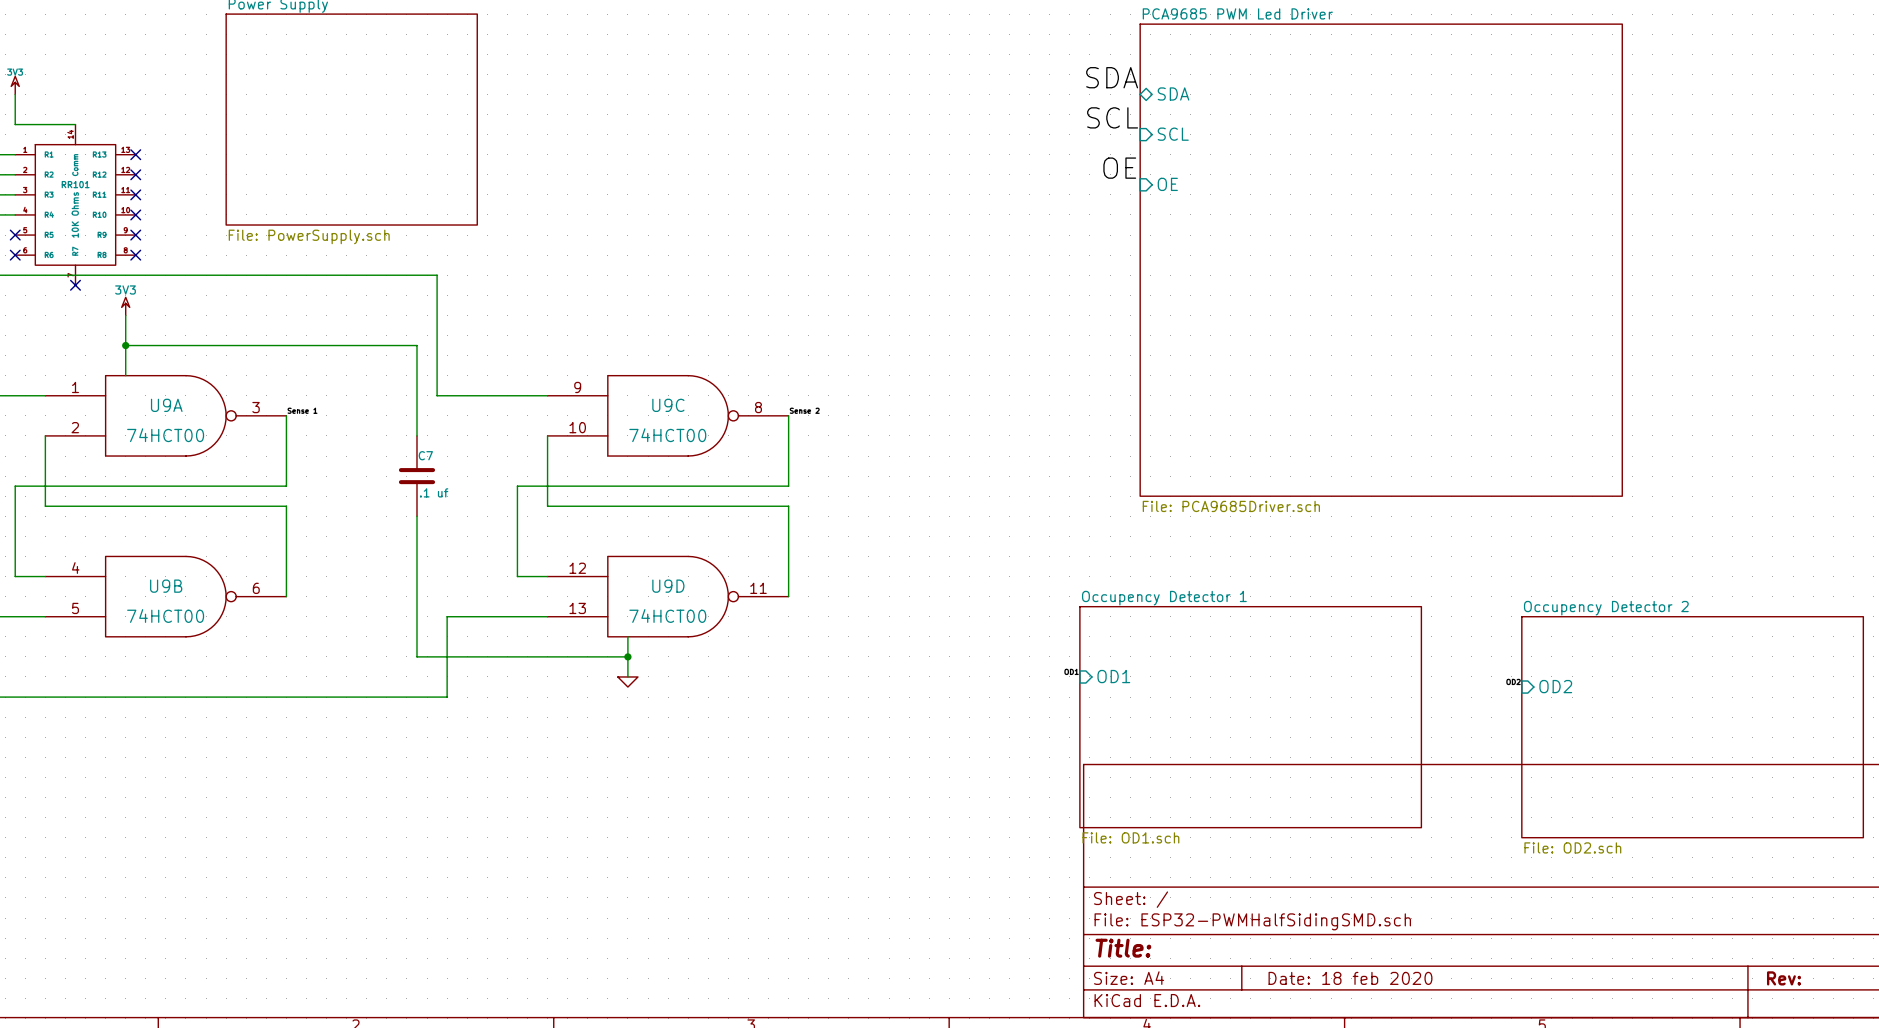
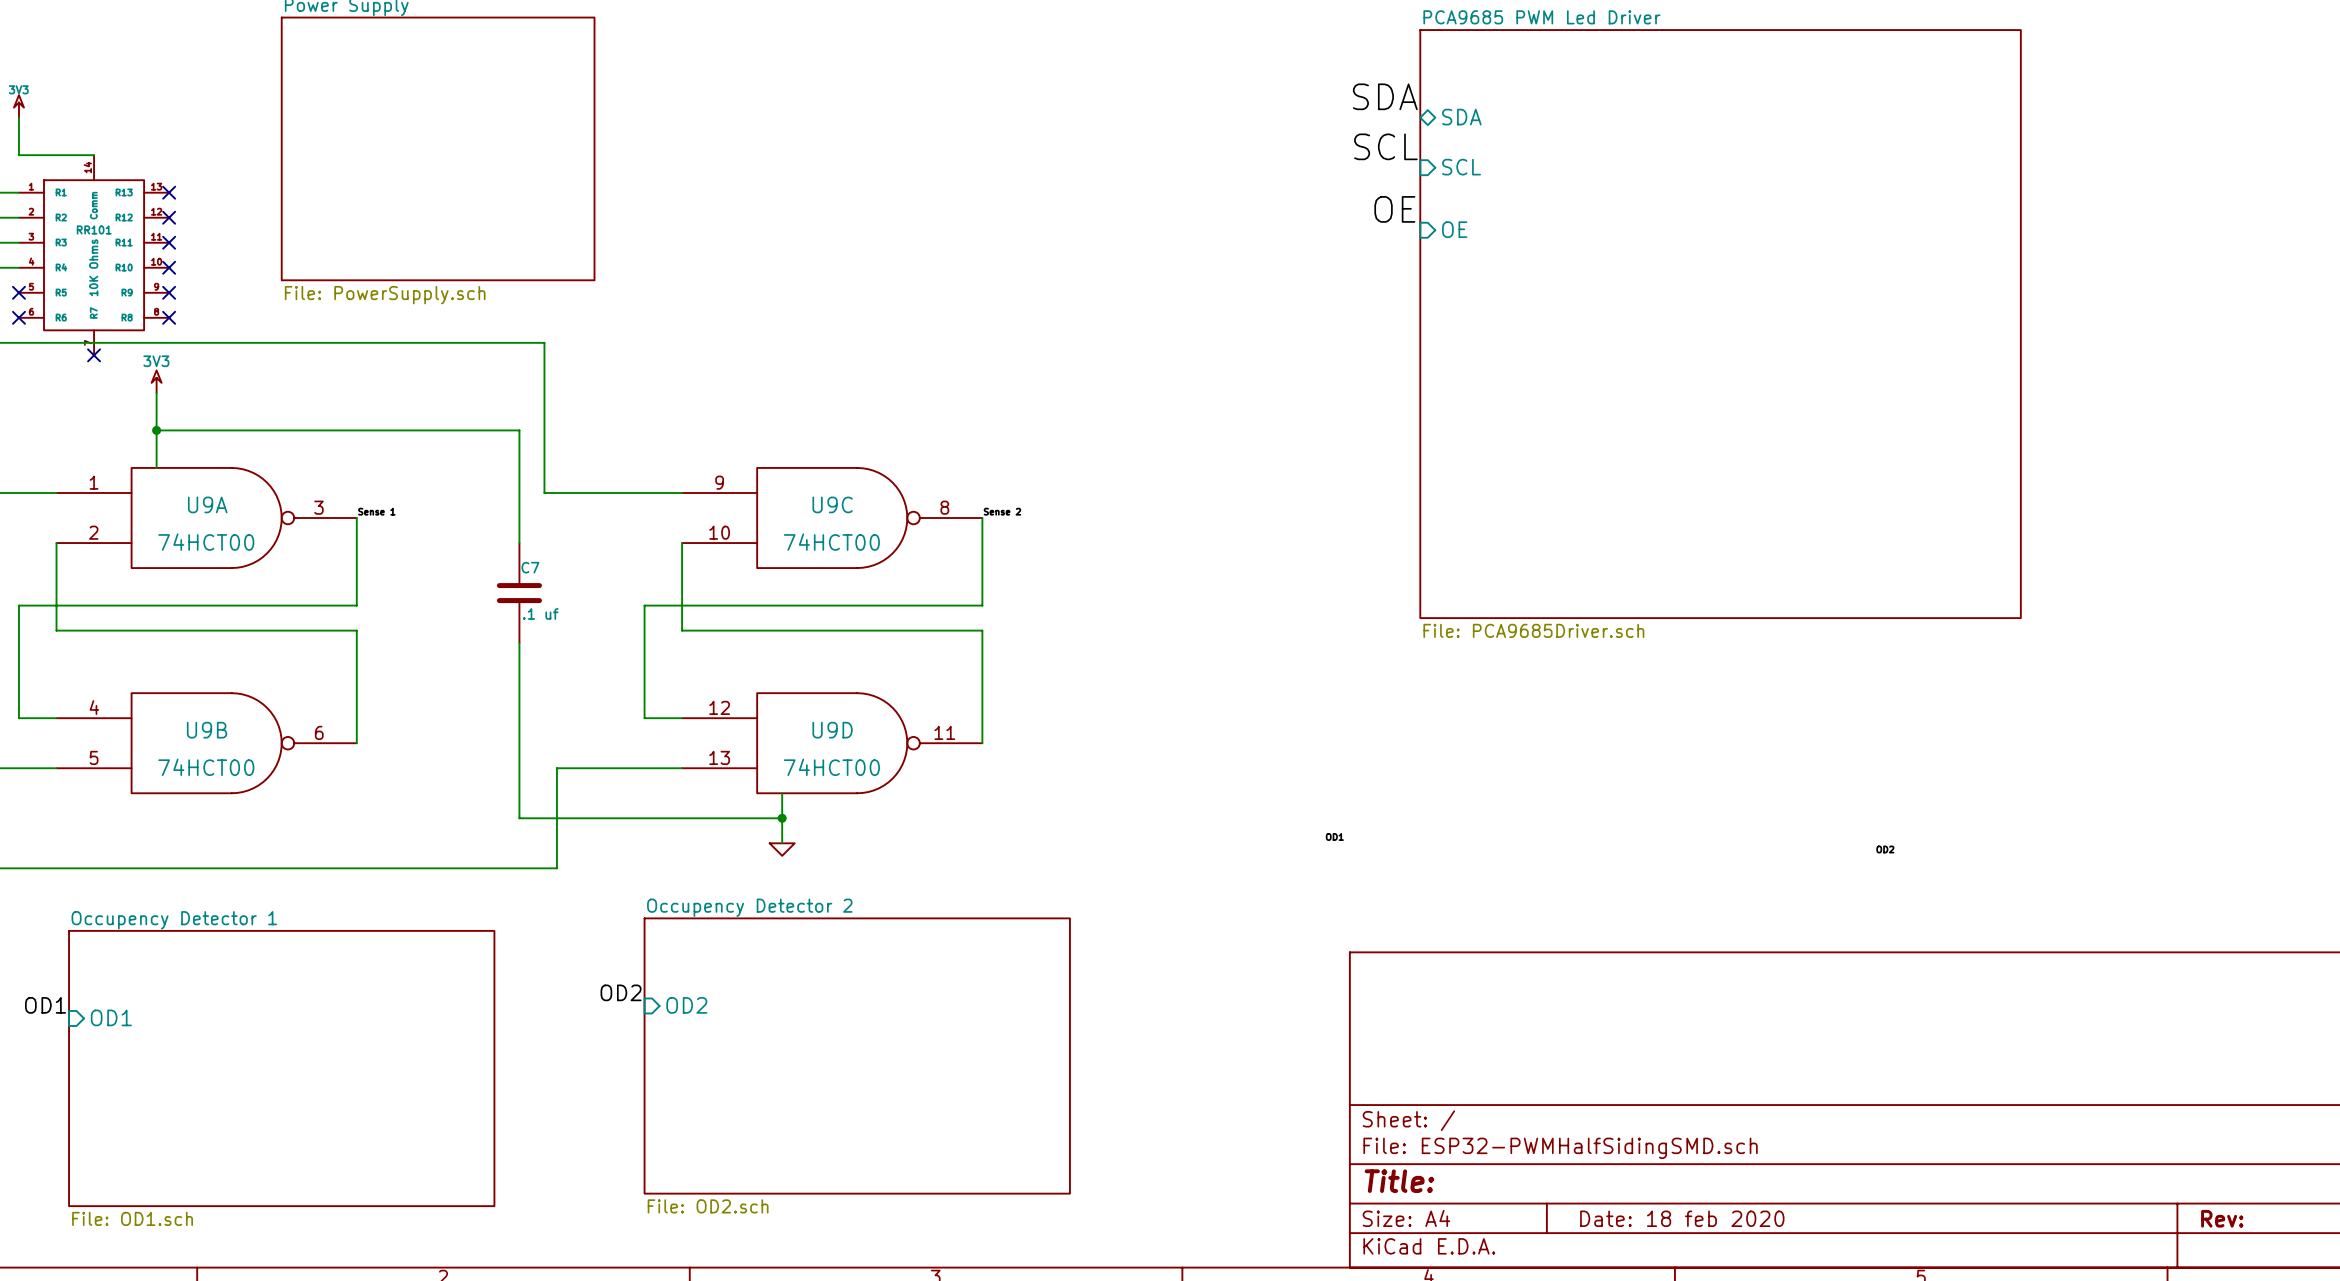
sheet pin: OD1 (1113, 676) -> none
sheet pin: OD2 (1555, 686) -> none
sheet Occupency Detector 1 position: (1250, 717) -> (281, 1068)
sheet Occupency Detector 2 position: (1692, 727) -> (857, 1056)
label: none -> OD2 (621, 992)
label: none -> OD1 (45, 1005)
sheet pin: none -> OD2 (686, 1005)
sheet pin: none -> OD1 (111, 1017)

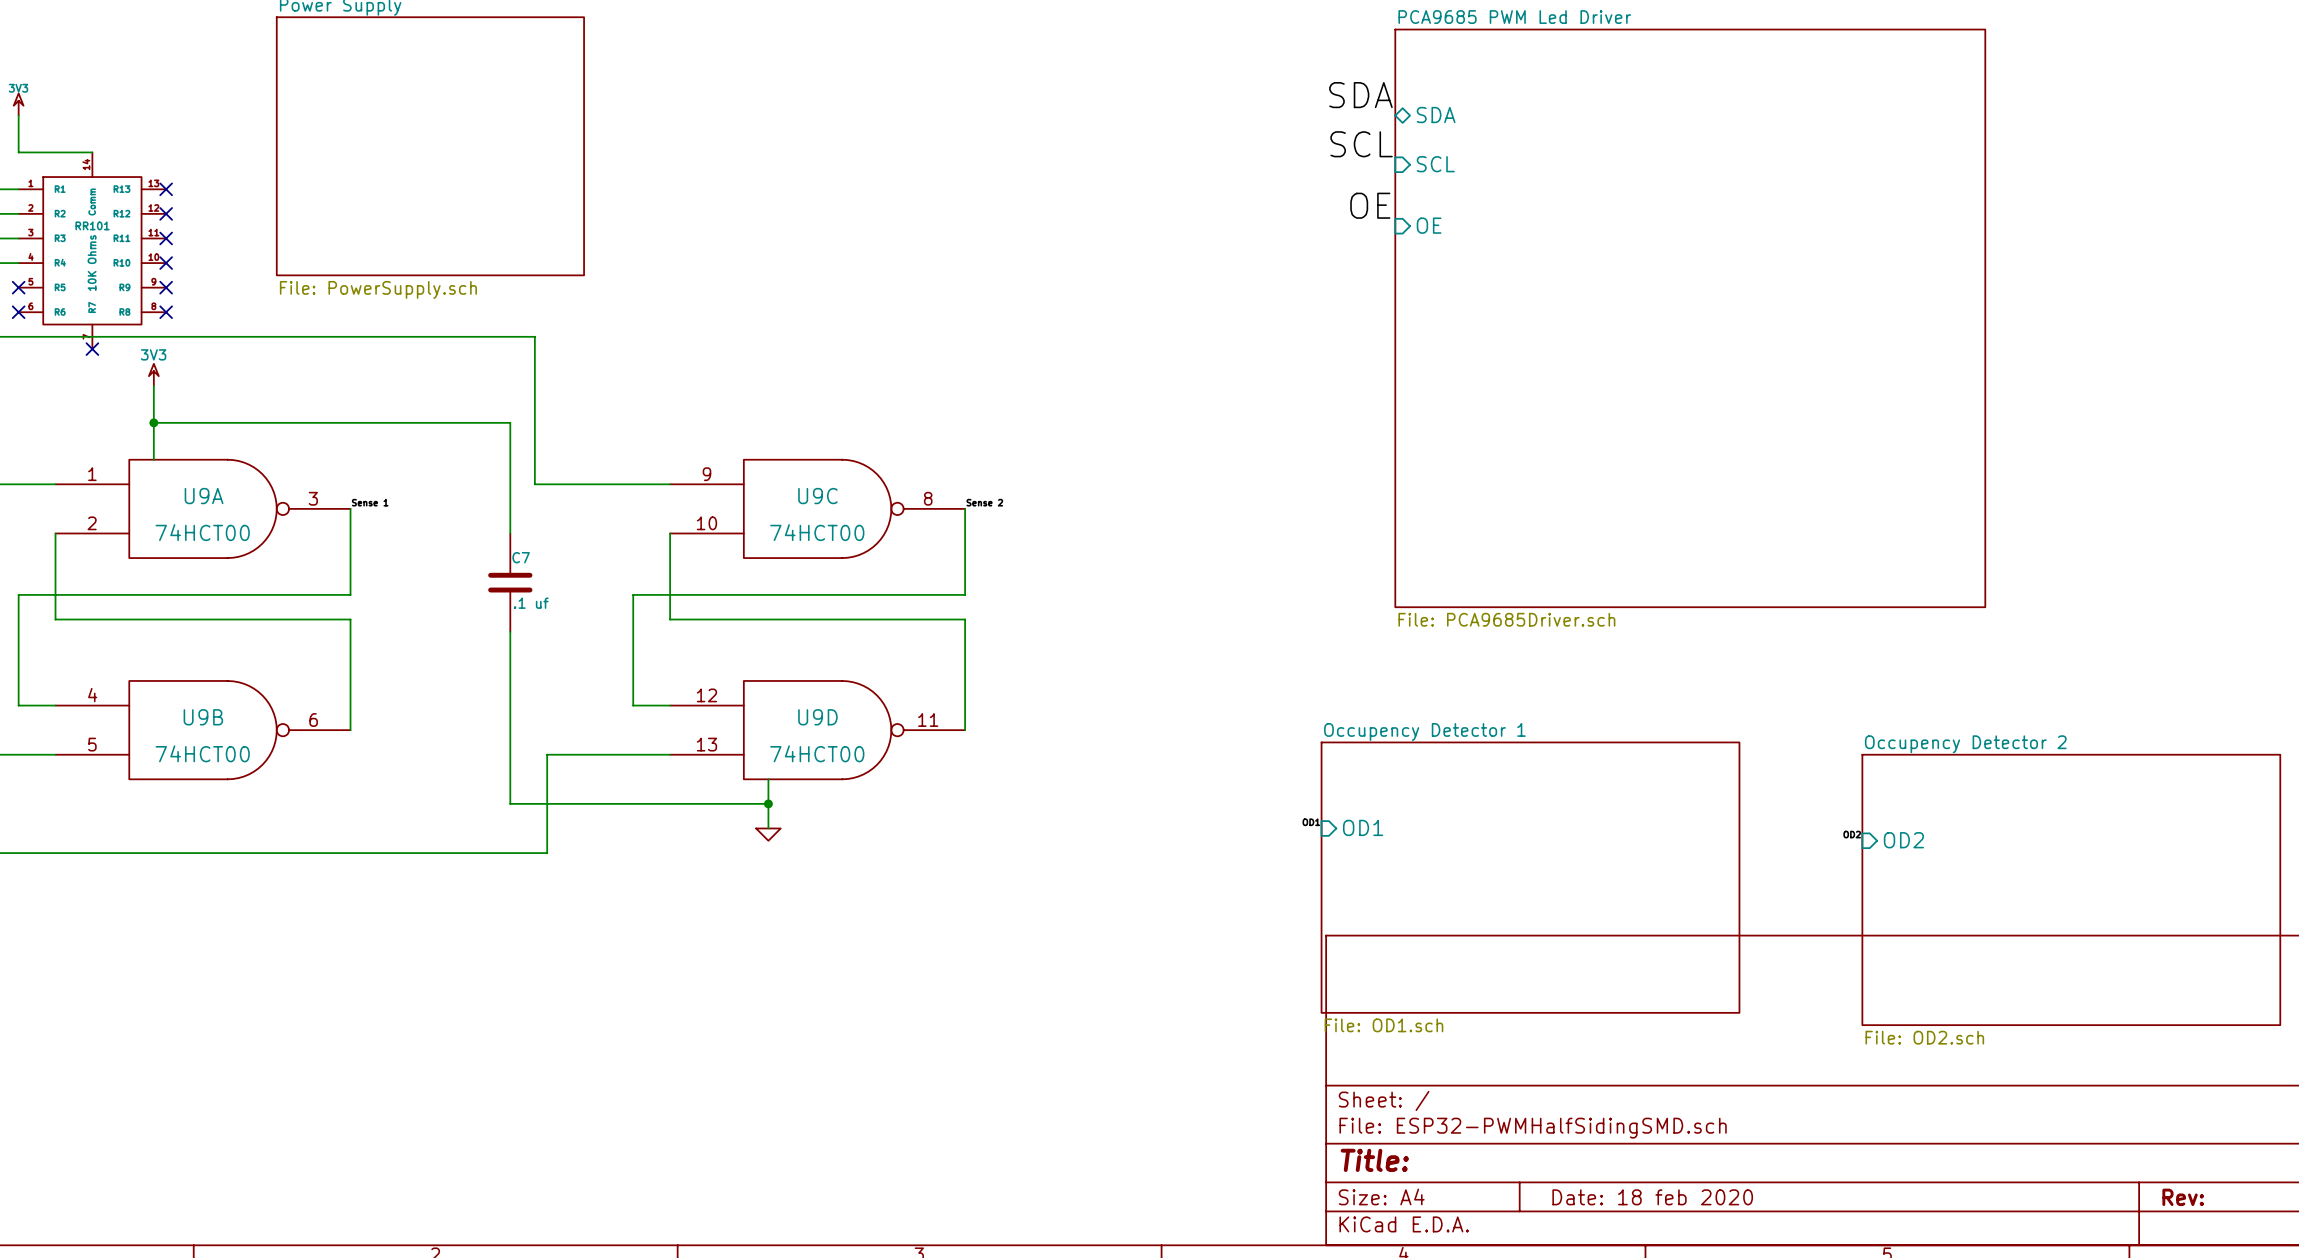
sheet pin: none -> OD1 (1363, 827)
sheet pin: none -> OD2 (1903, 840)
label: OD2 (621, 992) -> none
label: OD1 (45, 1005) -> none
sheet pin: OD2 (686, 1005) -> none
sheet pin: OD1 (111, 1017) -> none
sheet Occupency Detector 2 position: (857, 1056) -> (2071, 889)
sheet Occupency Detector 1 position: (281, 1068) -> (1530, 877)

